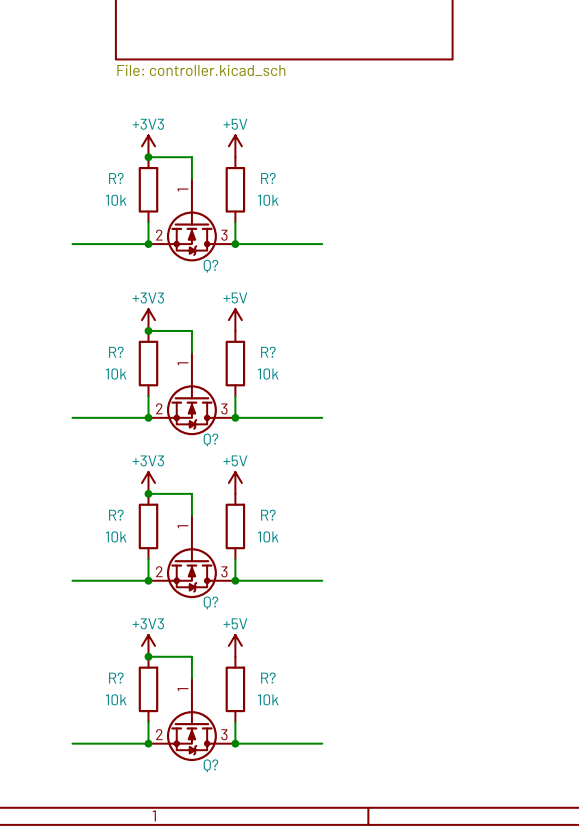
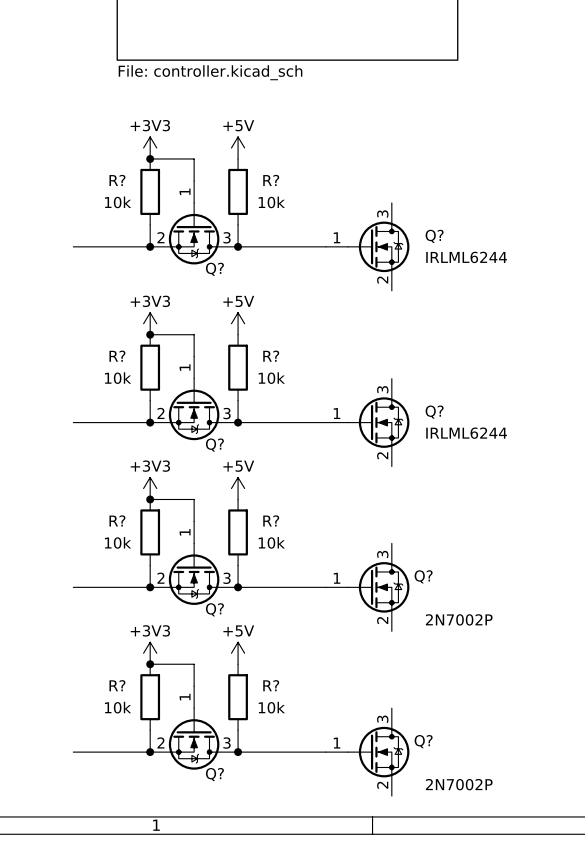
Q?: none -> IRLML6244 (367, 246)
Q?: none -> IRLML6244 (367, 422)
Q?: none -> 2N7002P (367, 587)
Q?: none -> 2N7002P (367, 752)

